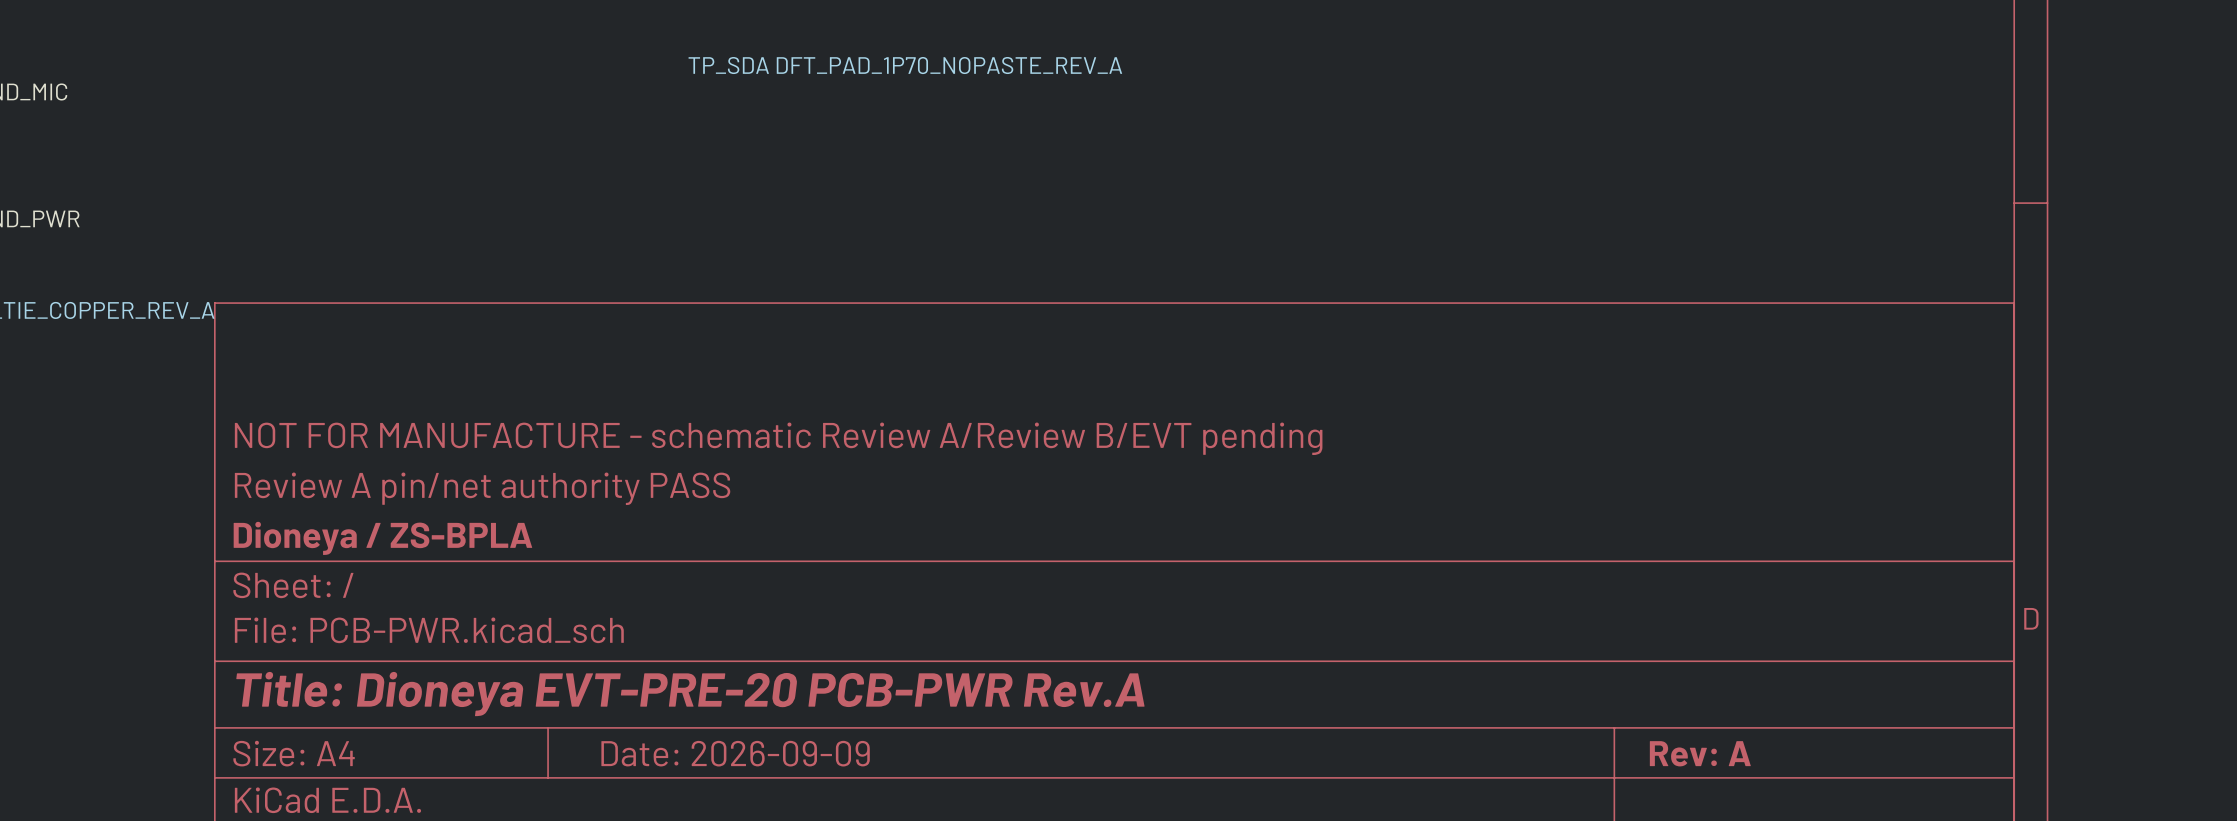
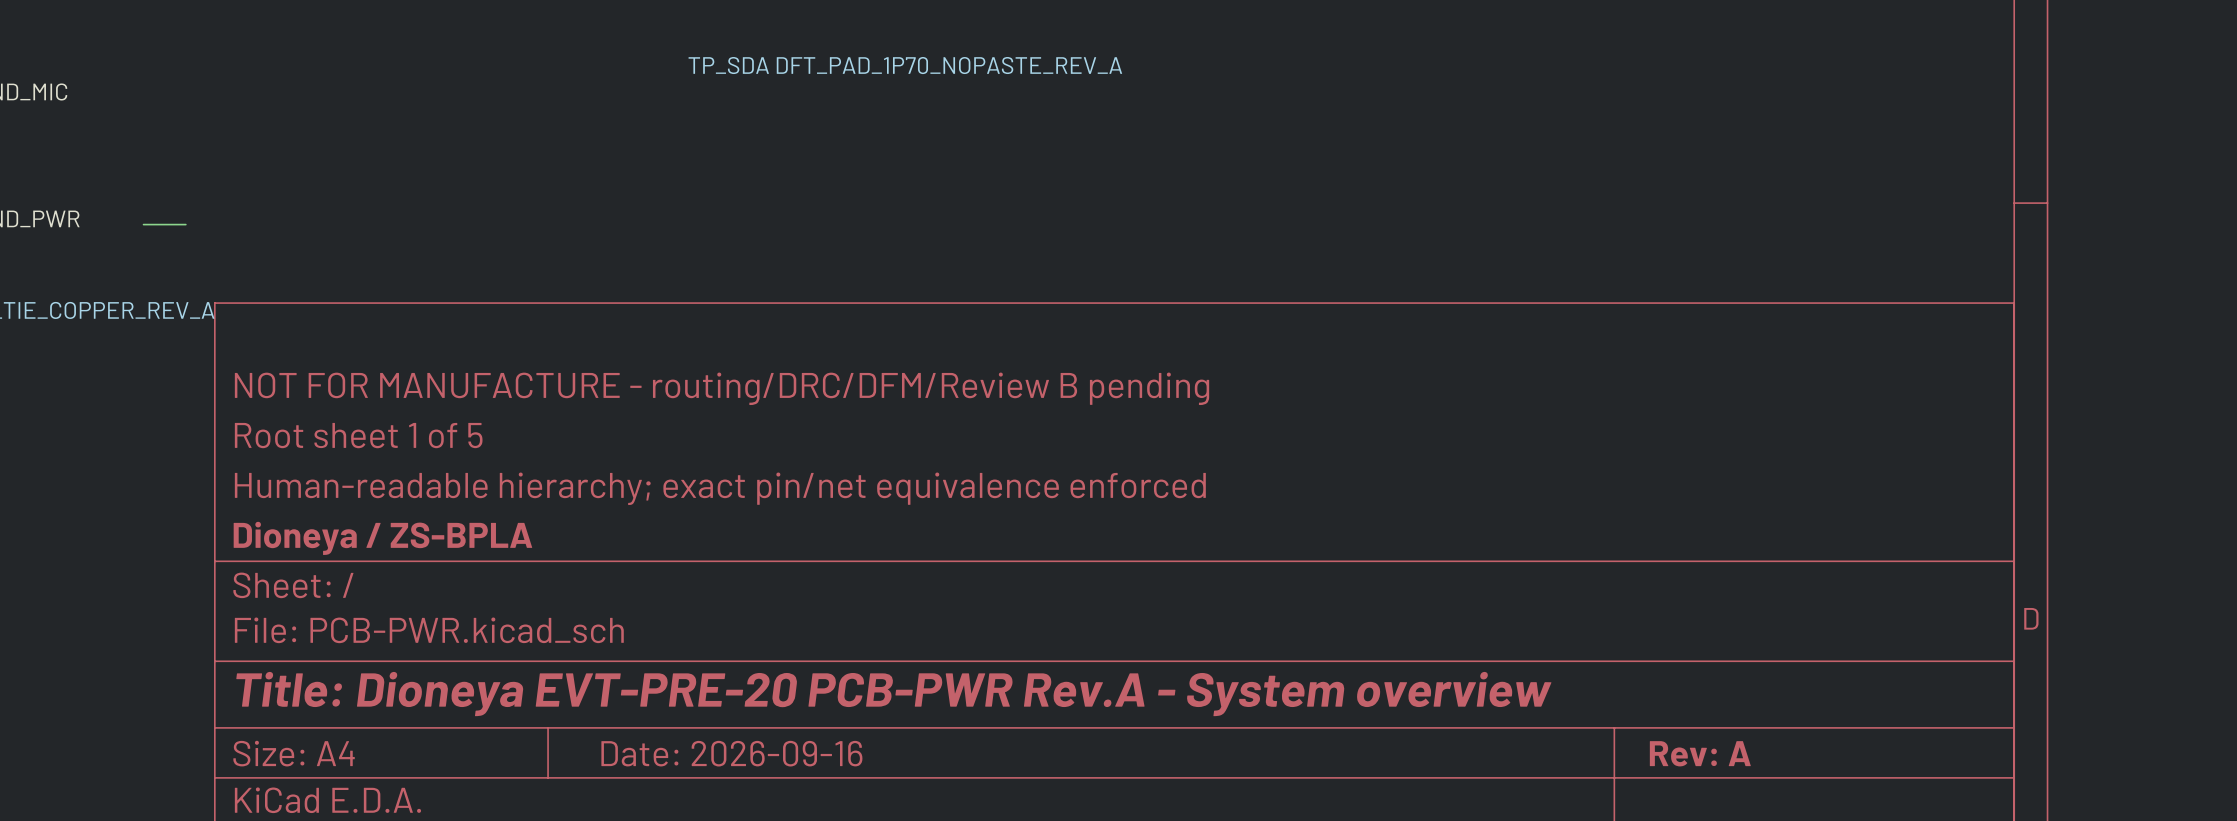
wire: none -> (143, 224) (185, 224)
title block: none -> NOT FOR MANUFACTURE - routing/DRC/DFM/Review B pending (722, 388)
title block: NOT FOR MANUFACTURE - schematic Review A/Review B/EVT pending (778, 438) -> Root sheet 1 of 5 (358, 435)
title block: Review A pin/net authority PASS (482, 488) -> Human-readable hierarchy; exact pin/net equivalence enforced (720, 488)
title block: Title: Dioneya EVT-PRE-20 PCB-PWR Rev.A (690, 694) -> Title: Dioneya EVT-PRE-20 PCB-PWR Rev.A - System overview (893, 694)
title block: Date: 2026-09-09 (735, 753) -> Date: 2026-09-16 (731, 753)

